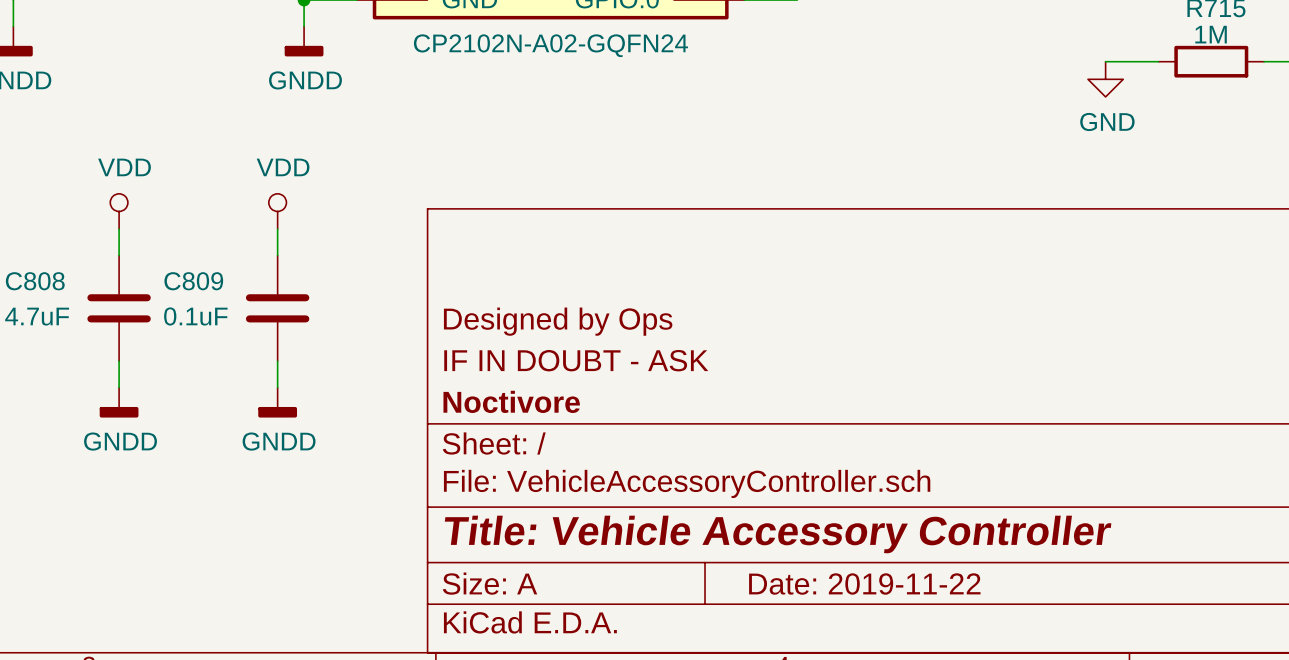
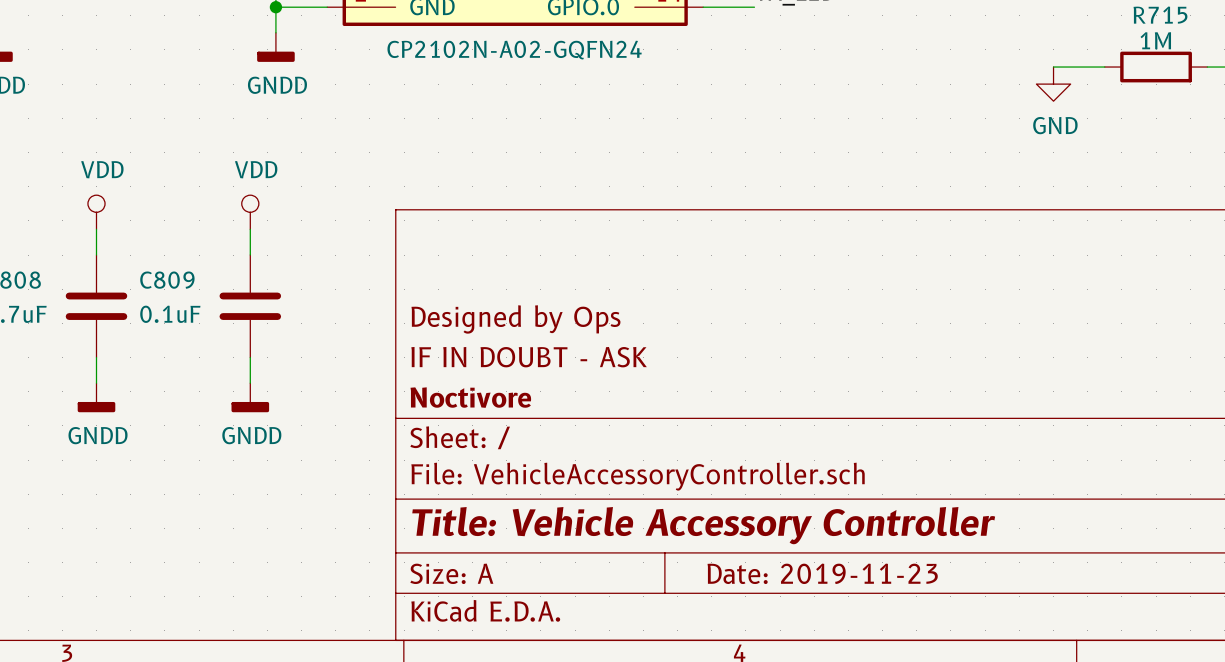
title block: Date: 2019-11-22 (864, 584) -> Date: 2019-11-23 (822, 573)

